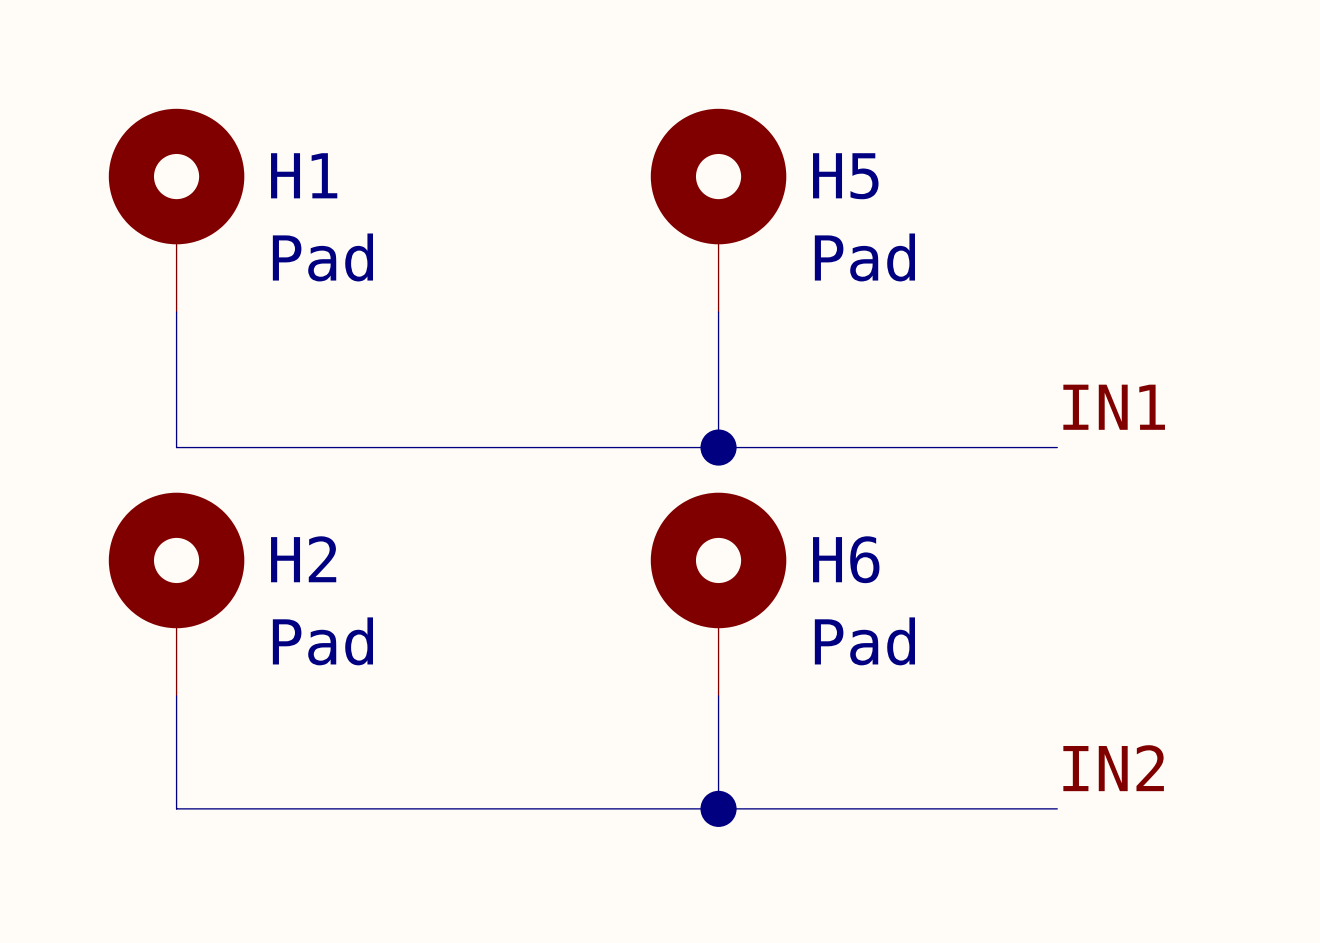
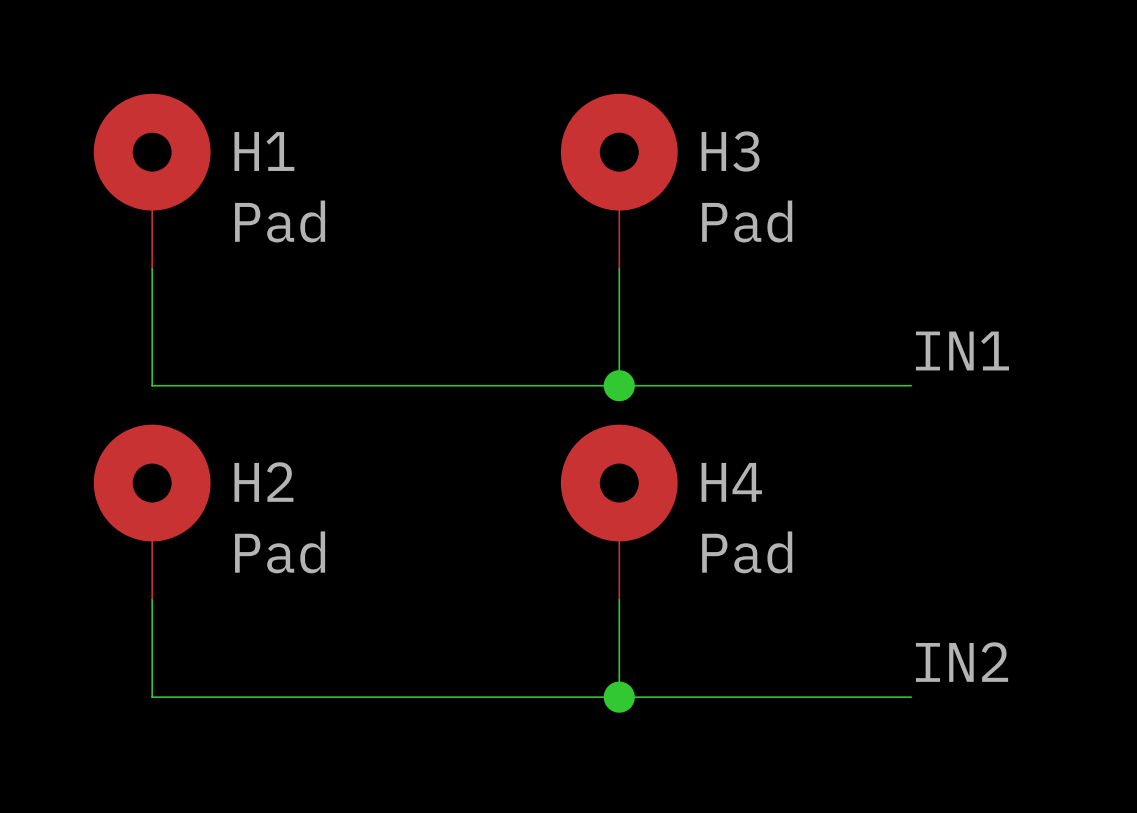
H5 name: H5 (845, 176) -> H3 (730, 151)
H6 name: H6 (846, 559) -> H4 (731, 482)

